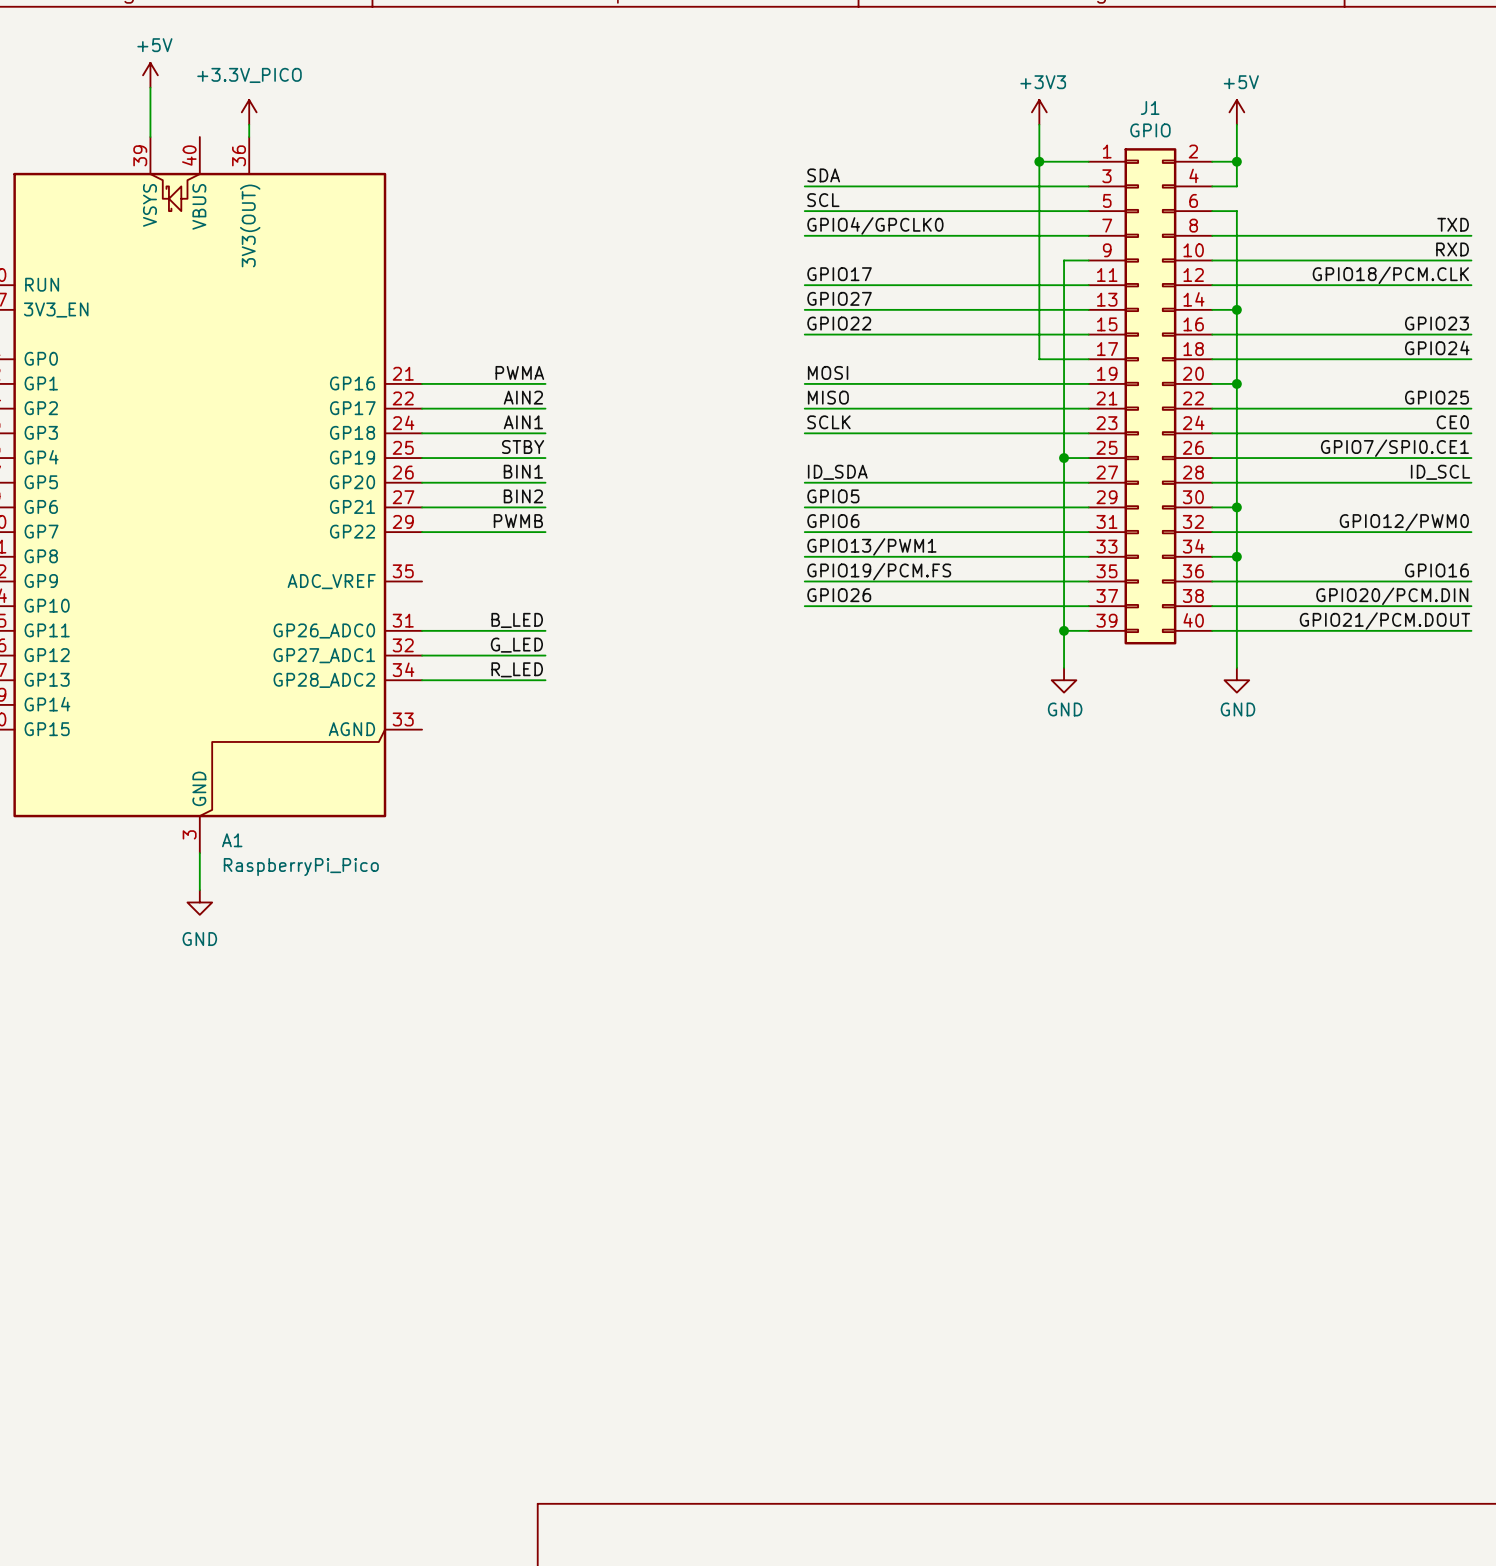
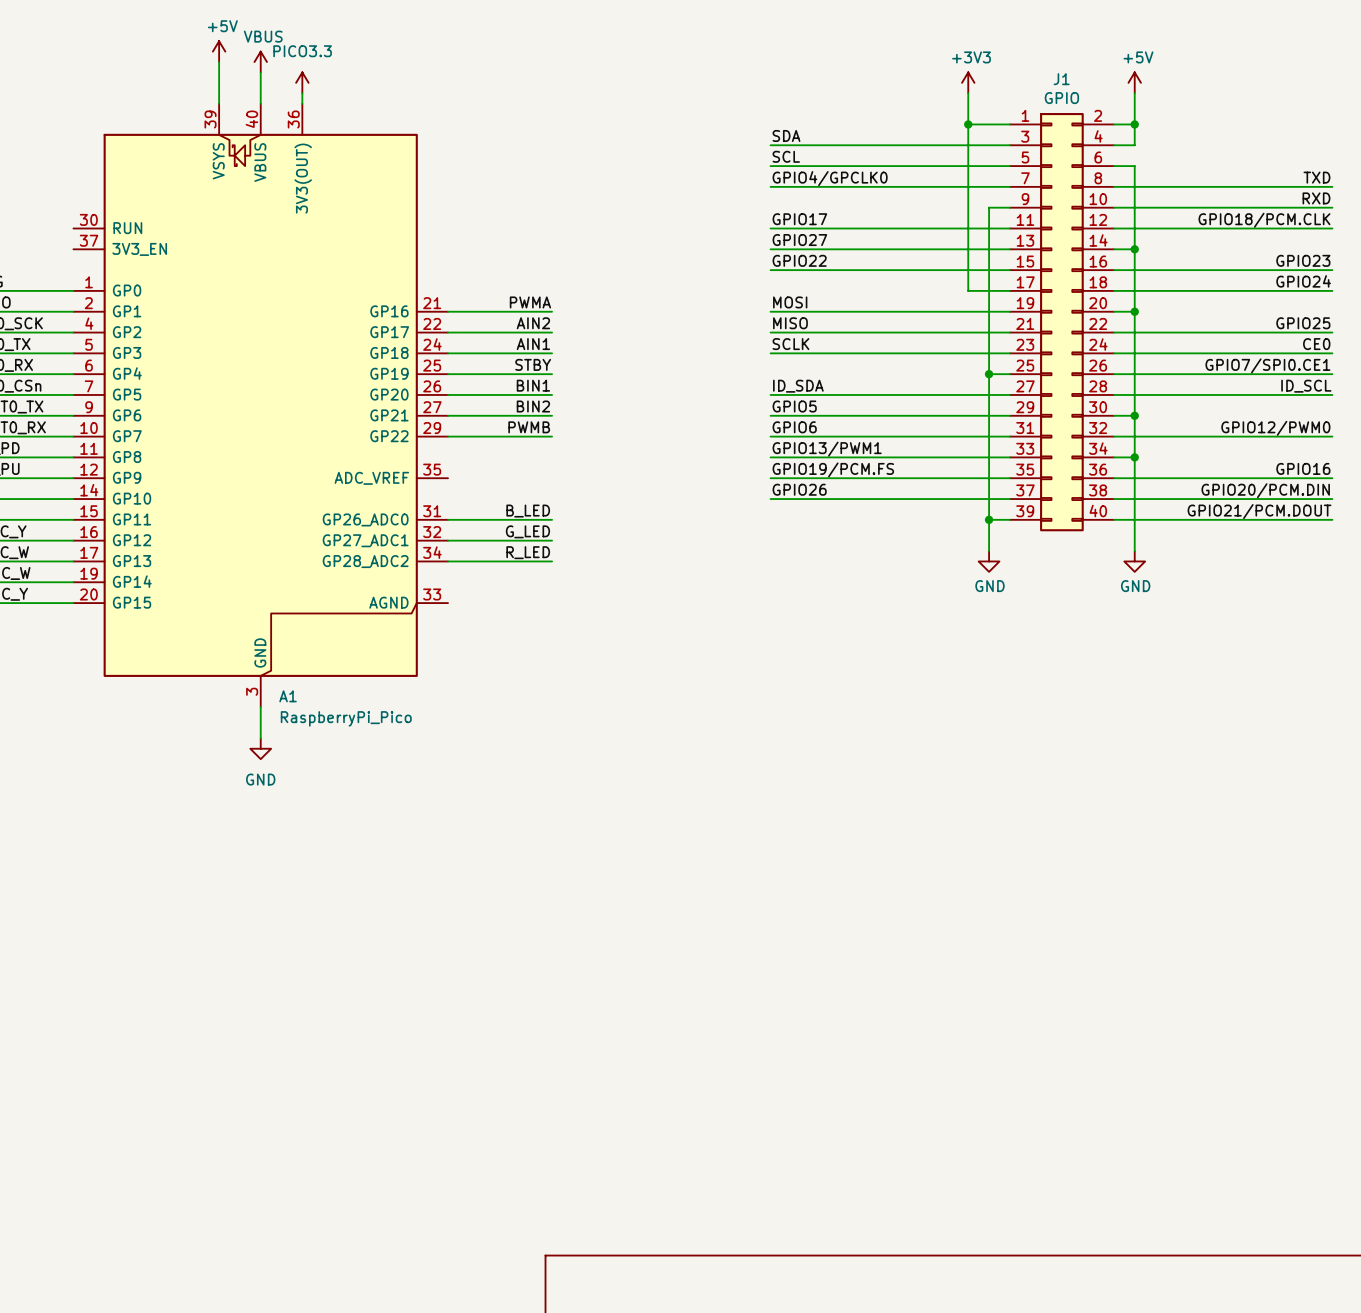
power symbol: none -> VBUS (260, 62)
wire: none -> (260, 72) (260, 103)
power symbol: +3.3V_PICO (249, 112) -> PICO3.3 (302, 82)

